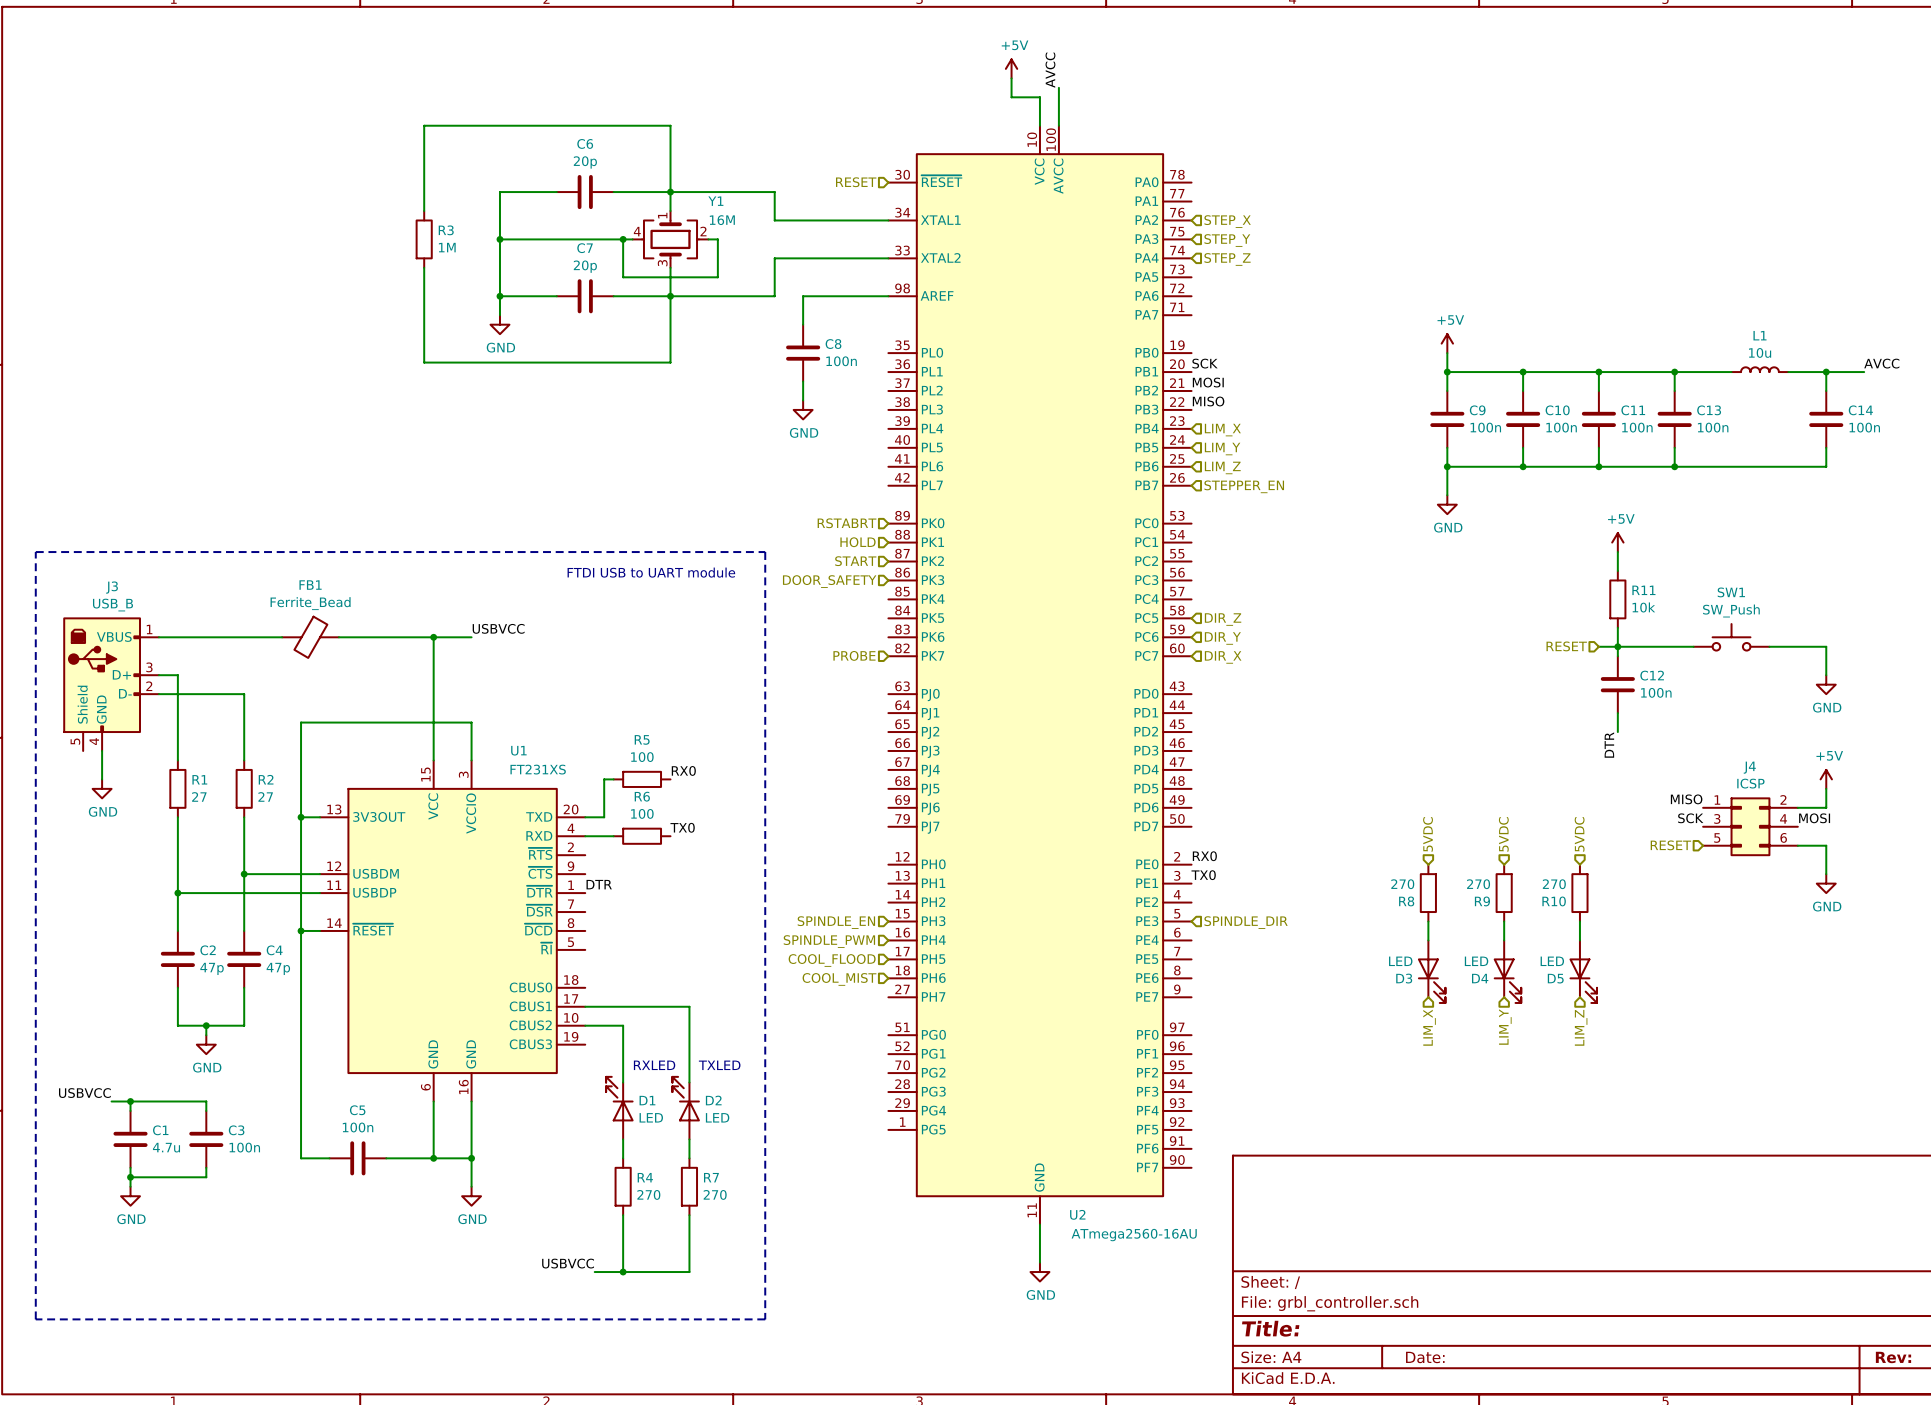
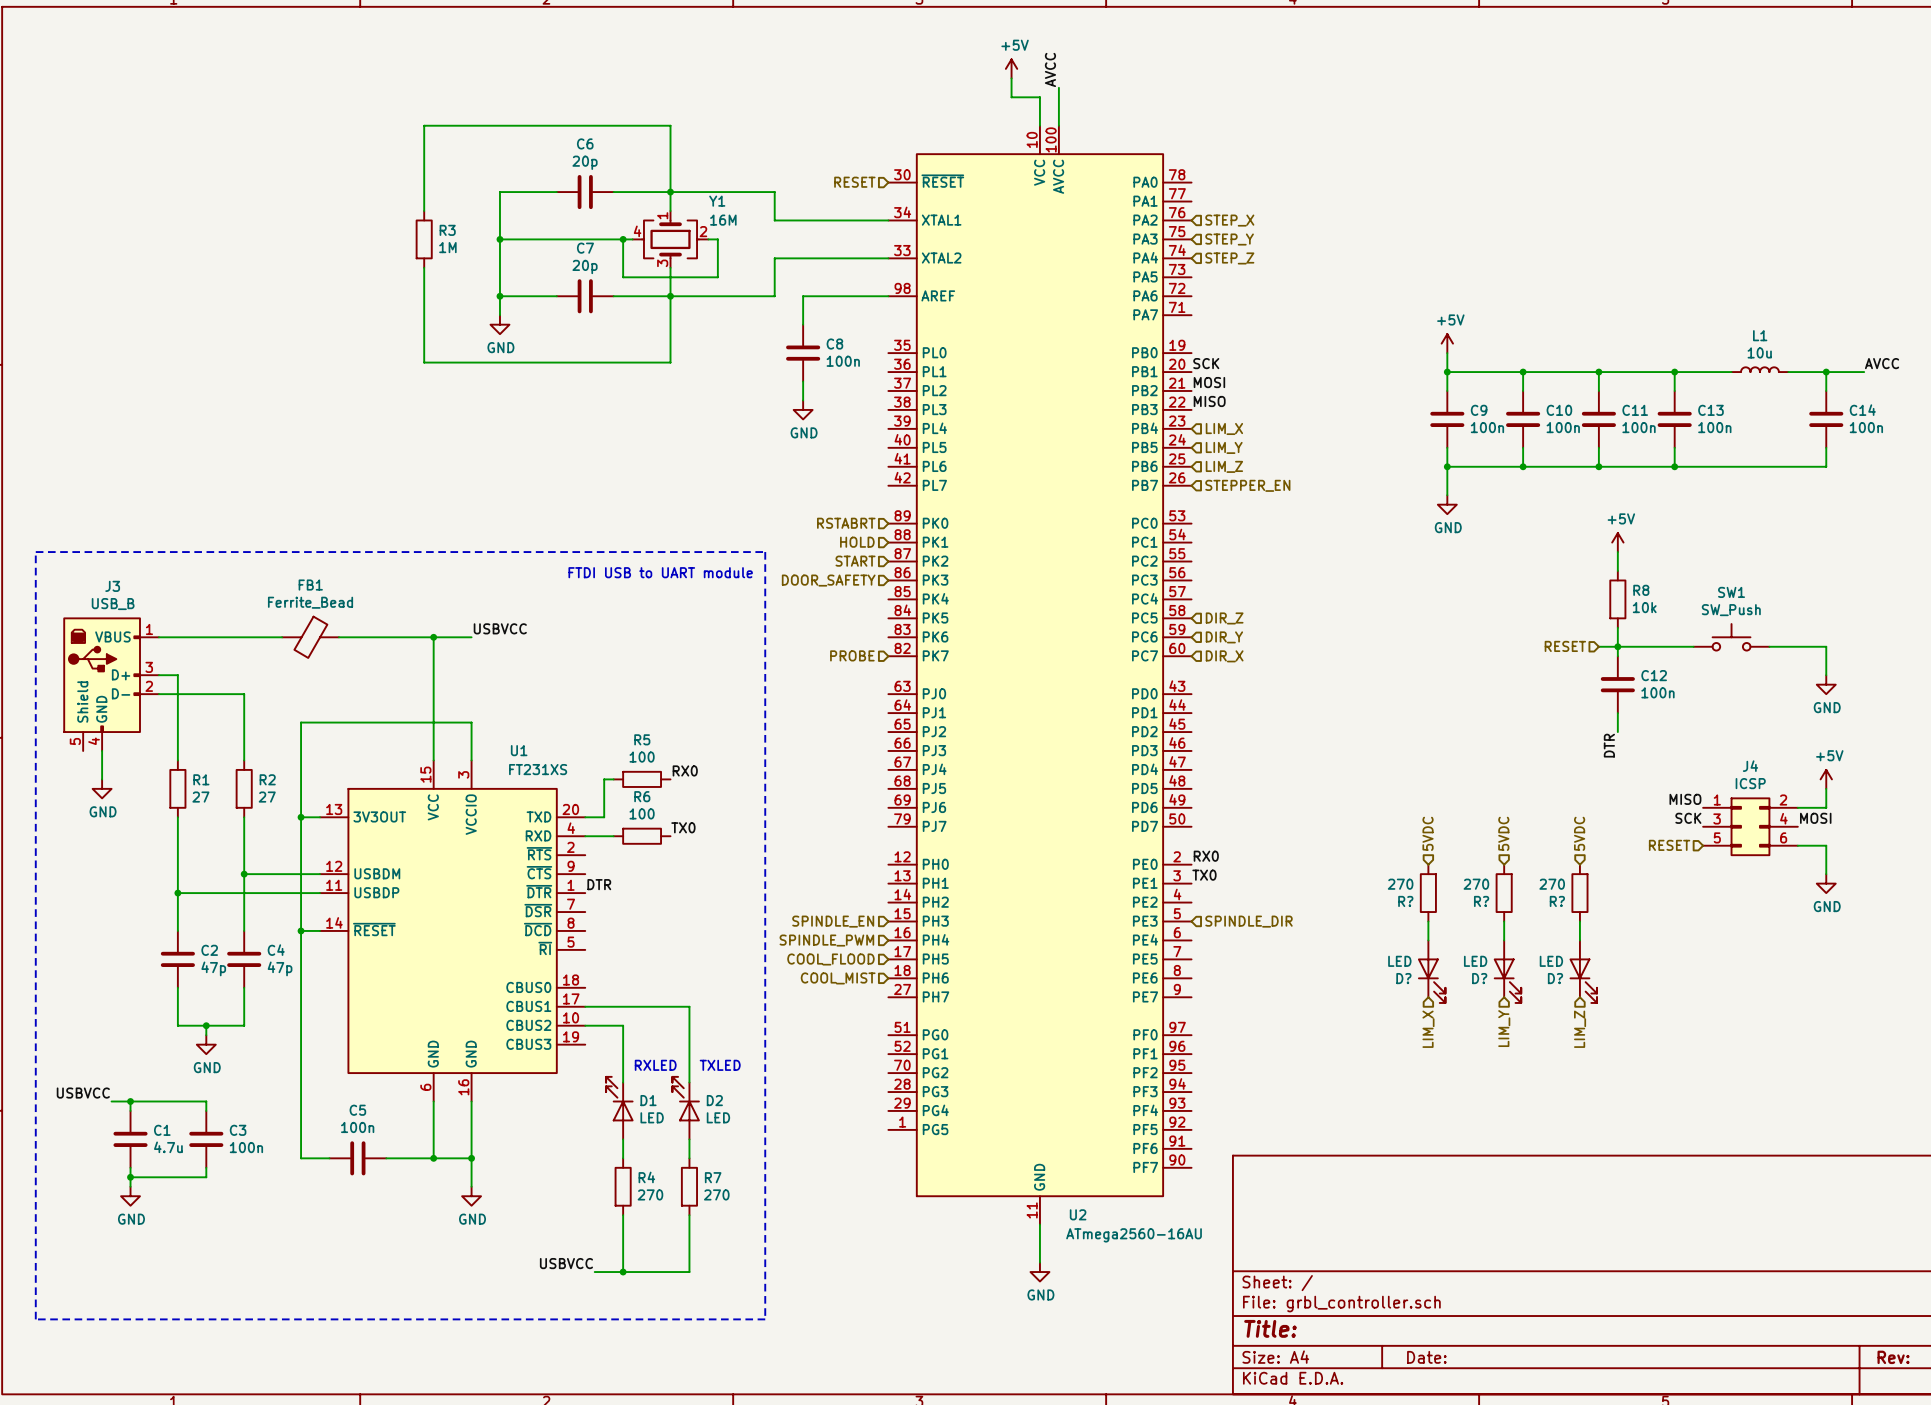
R11 name: R11 (1643, 590) -> R8 (1641, 590)
R8 name: R8 (1406, 901) -> R? (1405, 901)
R9 name: R9 (1482, 901) -> R? (1481, 901)
R10 name: R10 (1554, 901) -> R? (1557, 901)
D3 name: D3 (1404, 978) -> D? (1403, 978)
D4 name: D4 (1480, 978) -> D? (1479, 978)
D5 name: D5 (1555, 978) -> D? (1555, 978)

